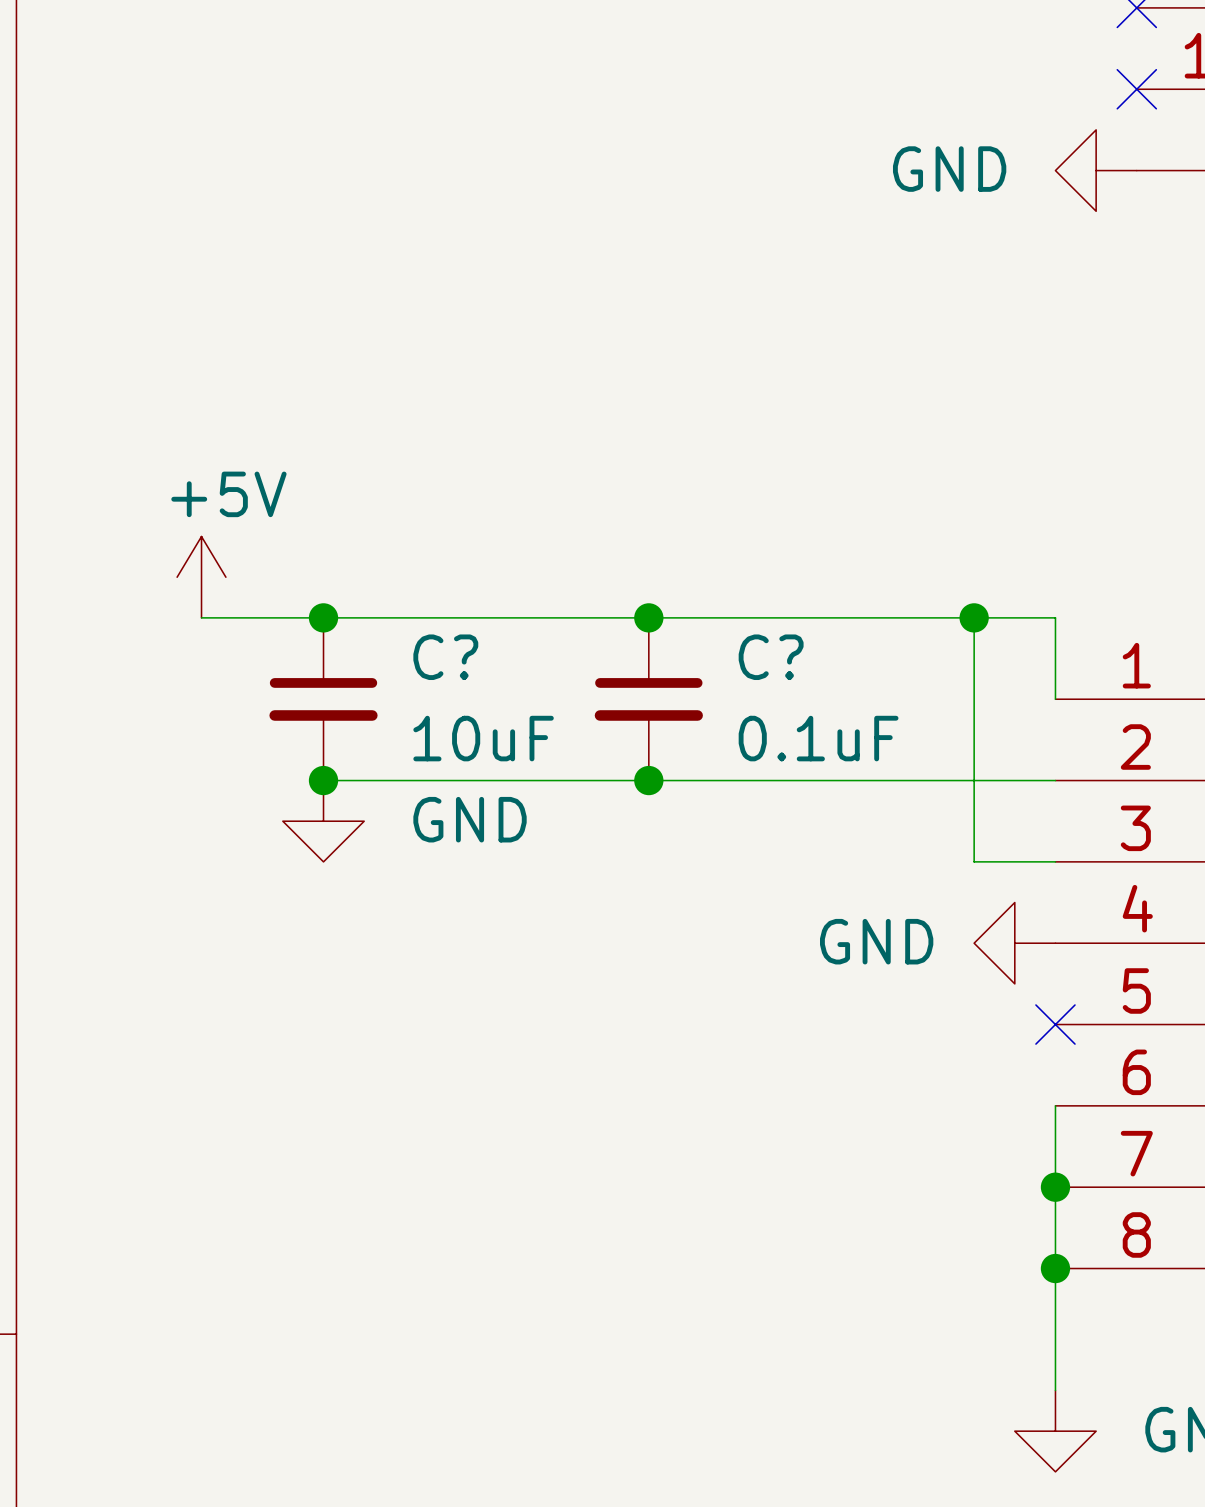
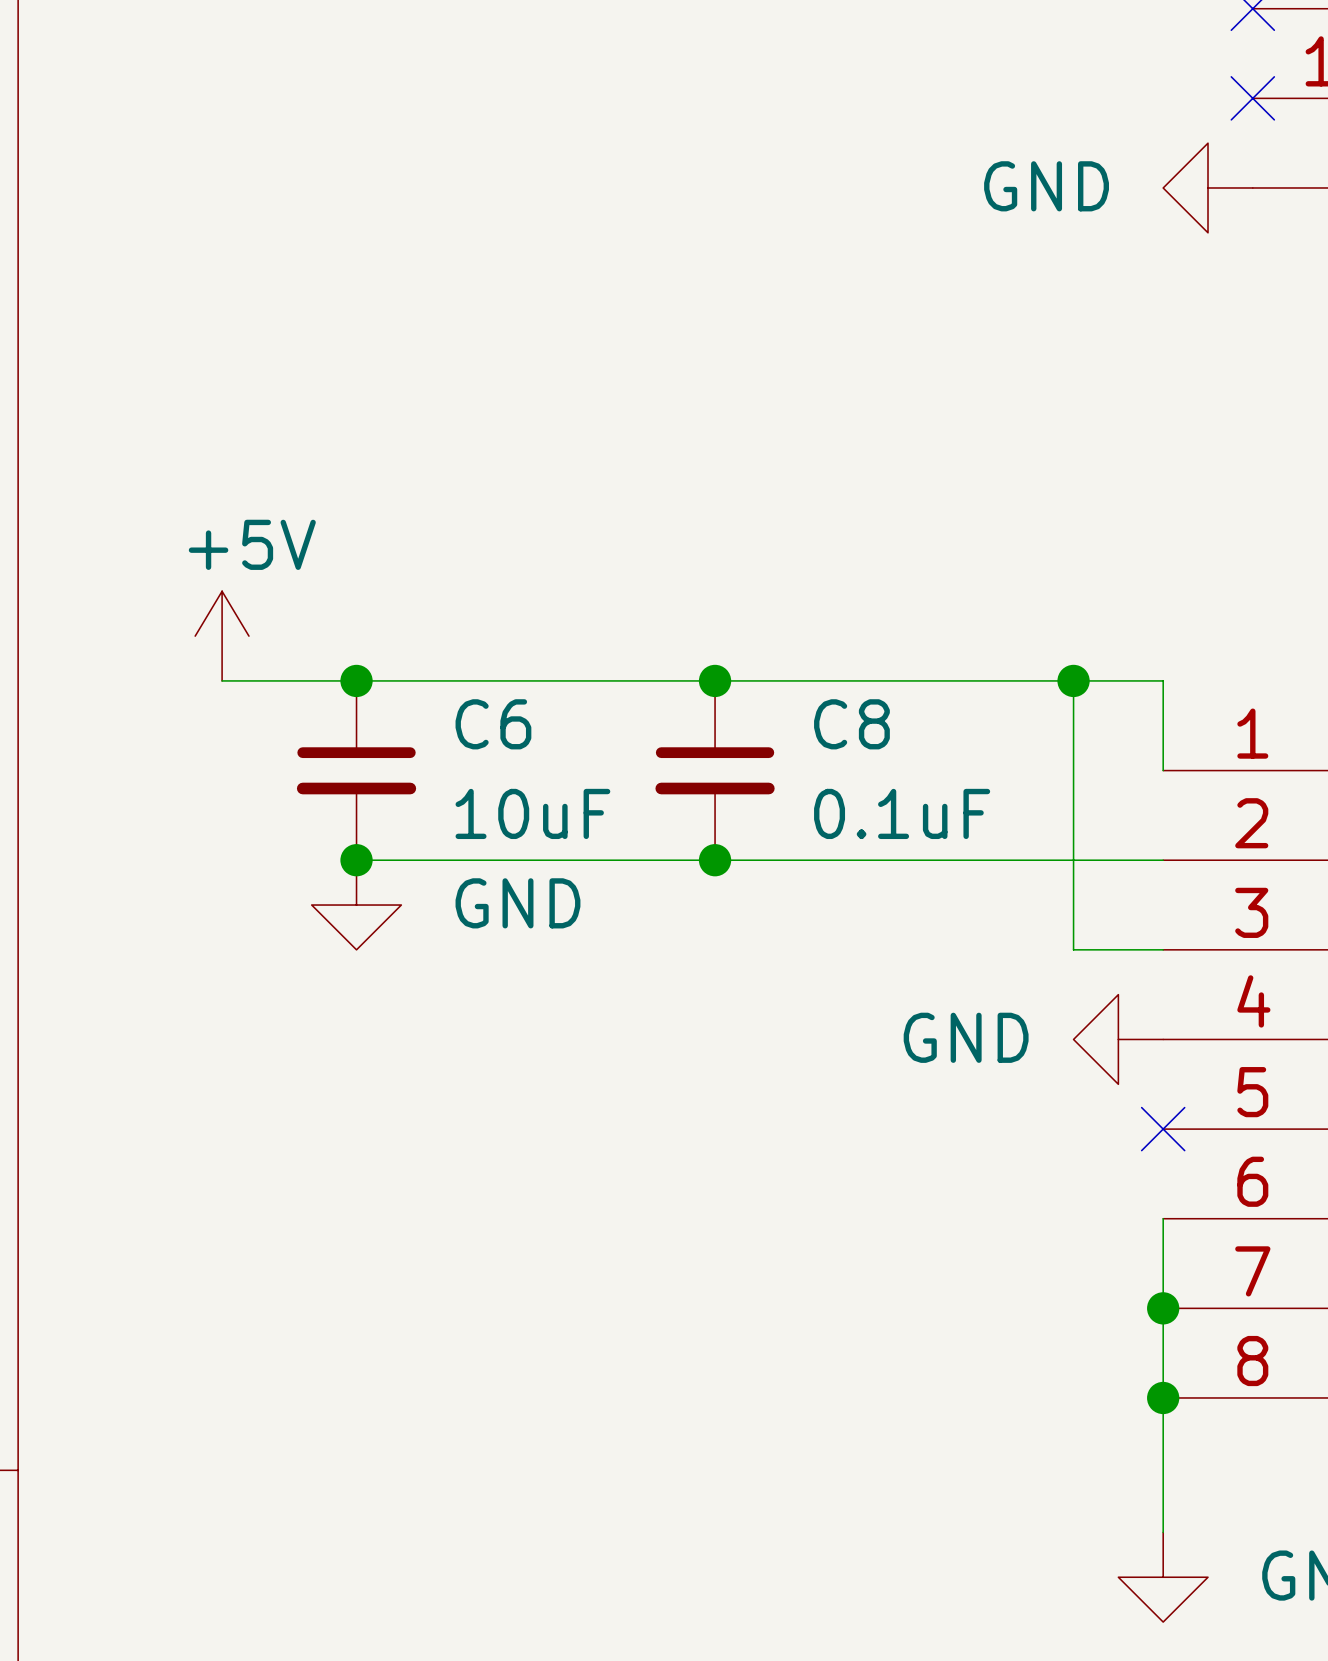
C? name: C? (445, 657) -> C6 (493, 724)
C? name: C? (771, 657) -> C8 (851, 724)

